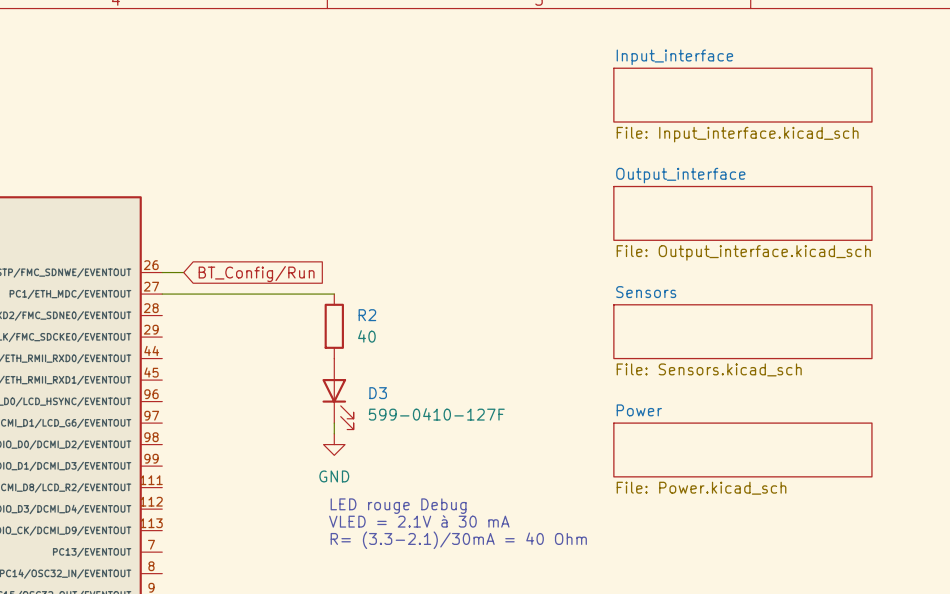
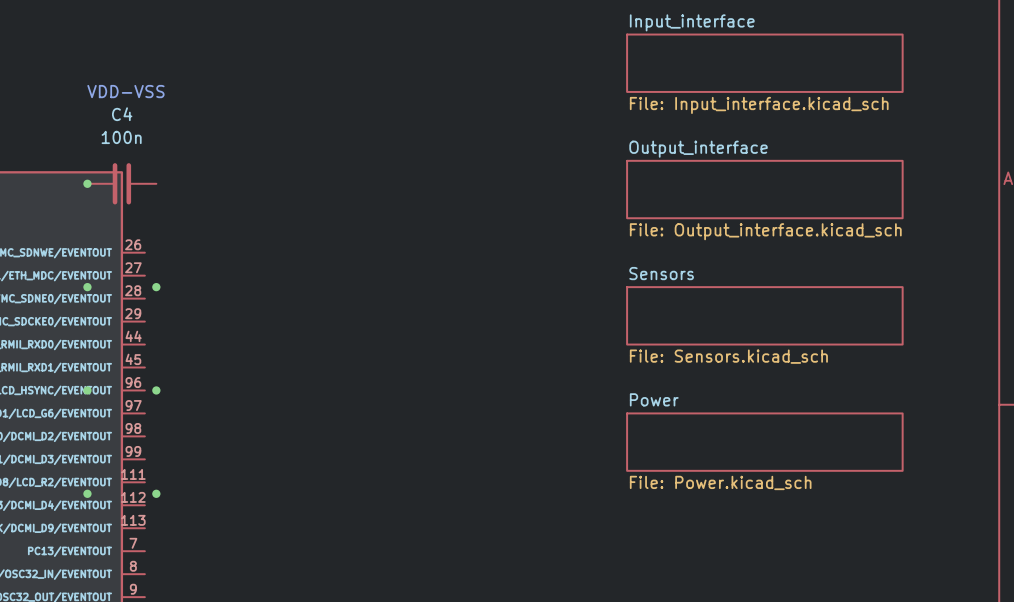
text: none -> VDD-VSS (125, 91)
junction: none -> (87, 183)
C4: none -> 100n (121, 183)
wire: (162, 272) (183, 272) -> none
global label: BT_Config/Run (256, 274) -> none
wire: (162, 294) (334, 294) -> none
junction: none -> (87, 287)
junction: none -> (156, 287)
R2: 40 (334, 326) -> none
D3: 599-0410-127F (338, 394) -> none
junction: none -> (87, 390)
junction: none -> (156, 390)
wire: (334, 423) (334, 433) -> none
power symbol: GND (334, 444) -> none
junction: none -> (87, 493)
junction: none -> (156, 493)
text: LED rouge Debug (398, 506) -> none
text: VLED = 2.1V à 30 mA (419, 521) -> none
text: R= (3.3-2.1)/30mA = 40 Ohm (458, 540) -> none

